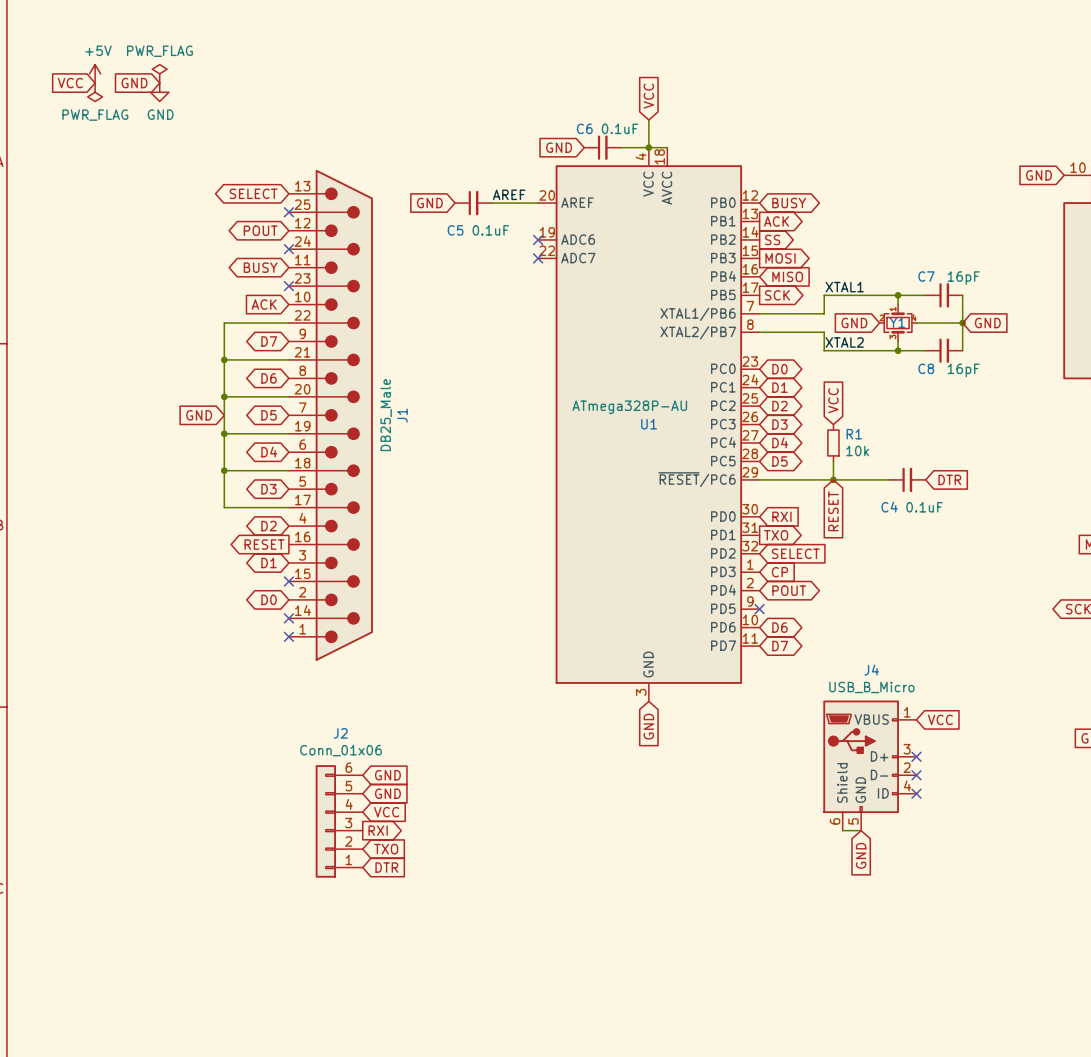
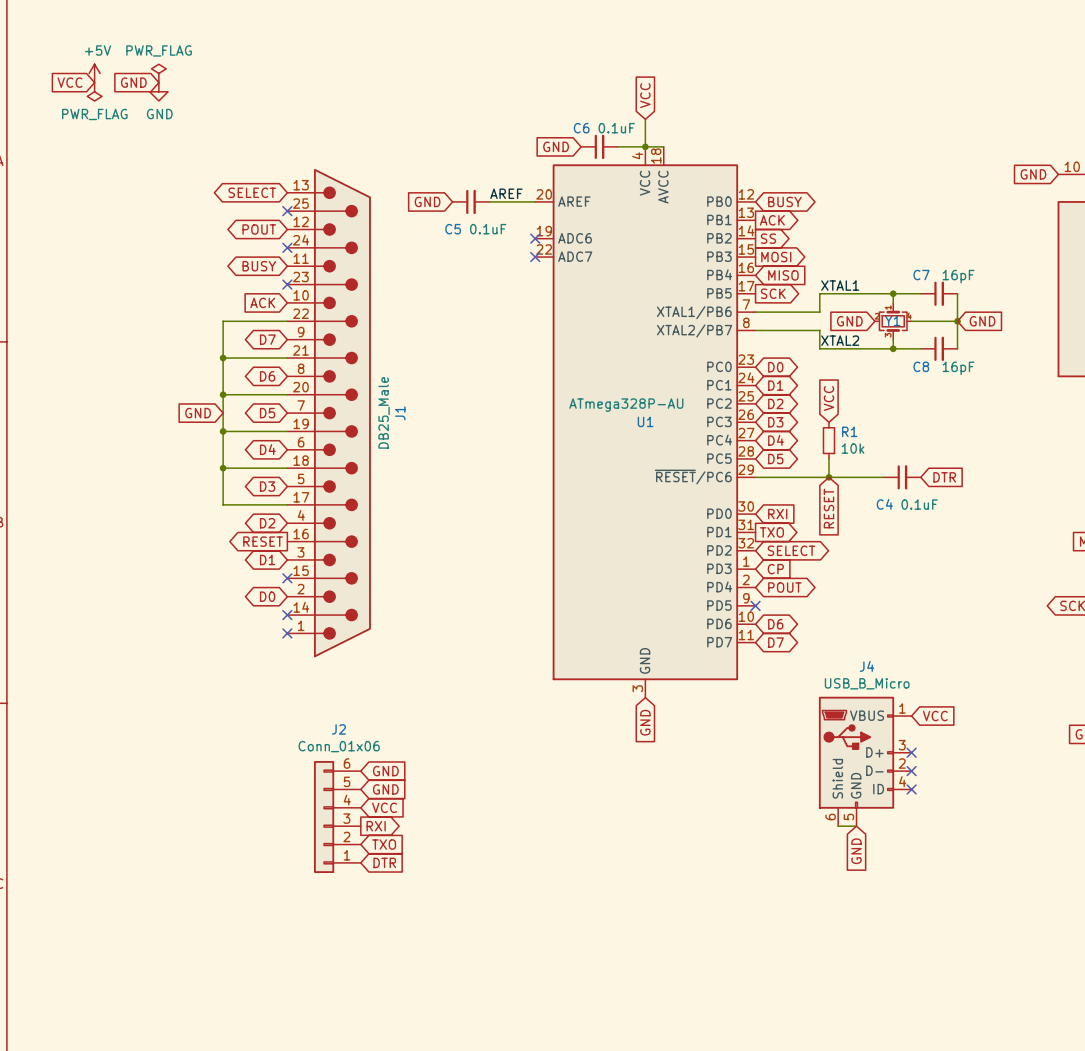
global label shape: input (795, 553) -> bidirectional (791, 550)

